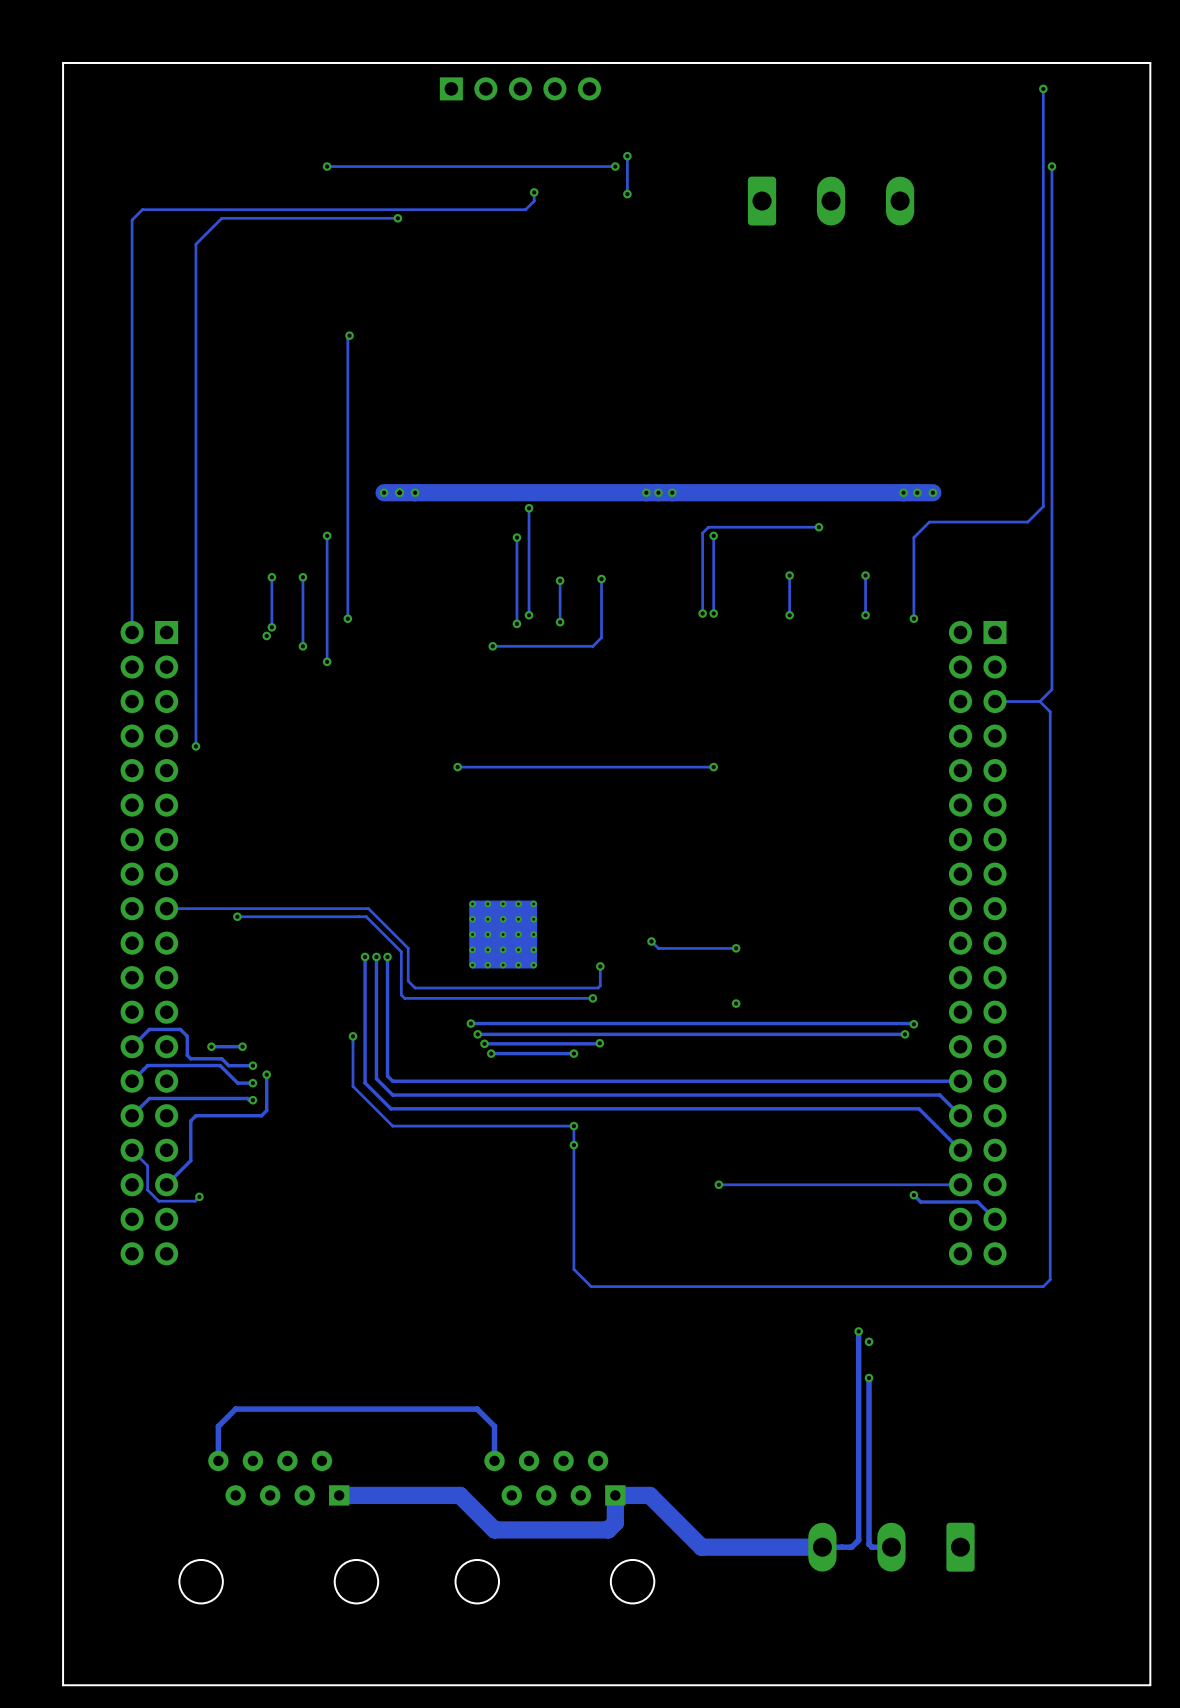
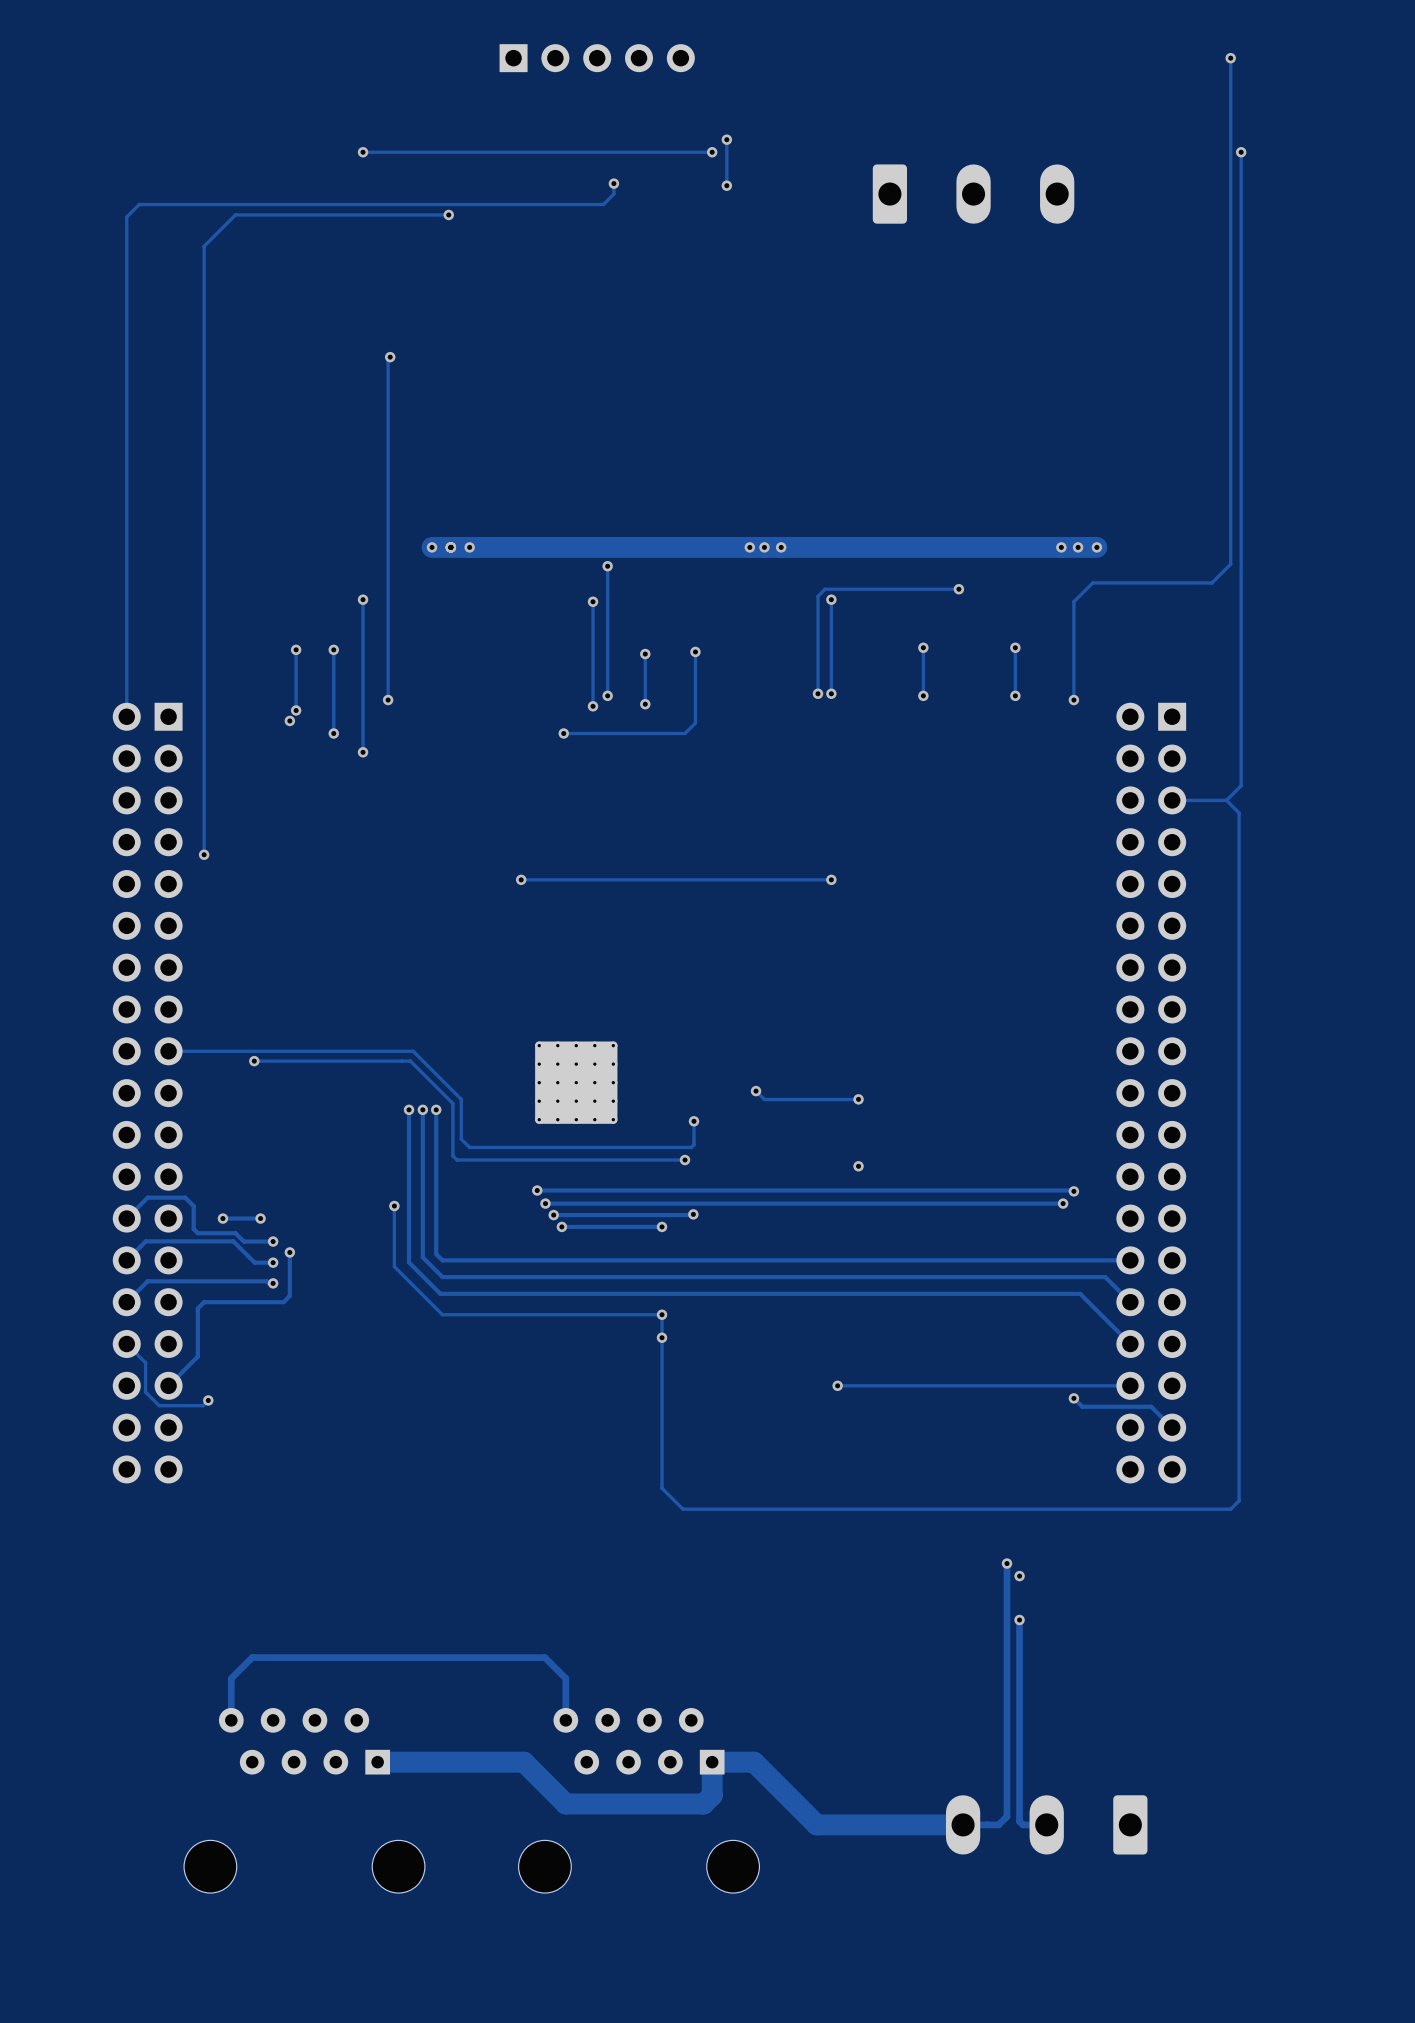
board edge: (1150, 62) (1150, 1685) (63, 1685) (63, 62) (1150, 62) -> none

